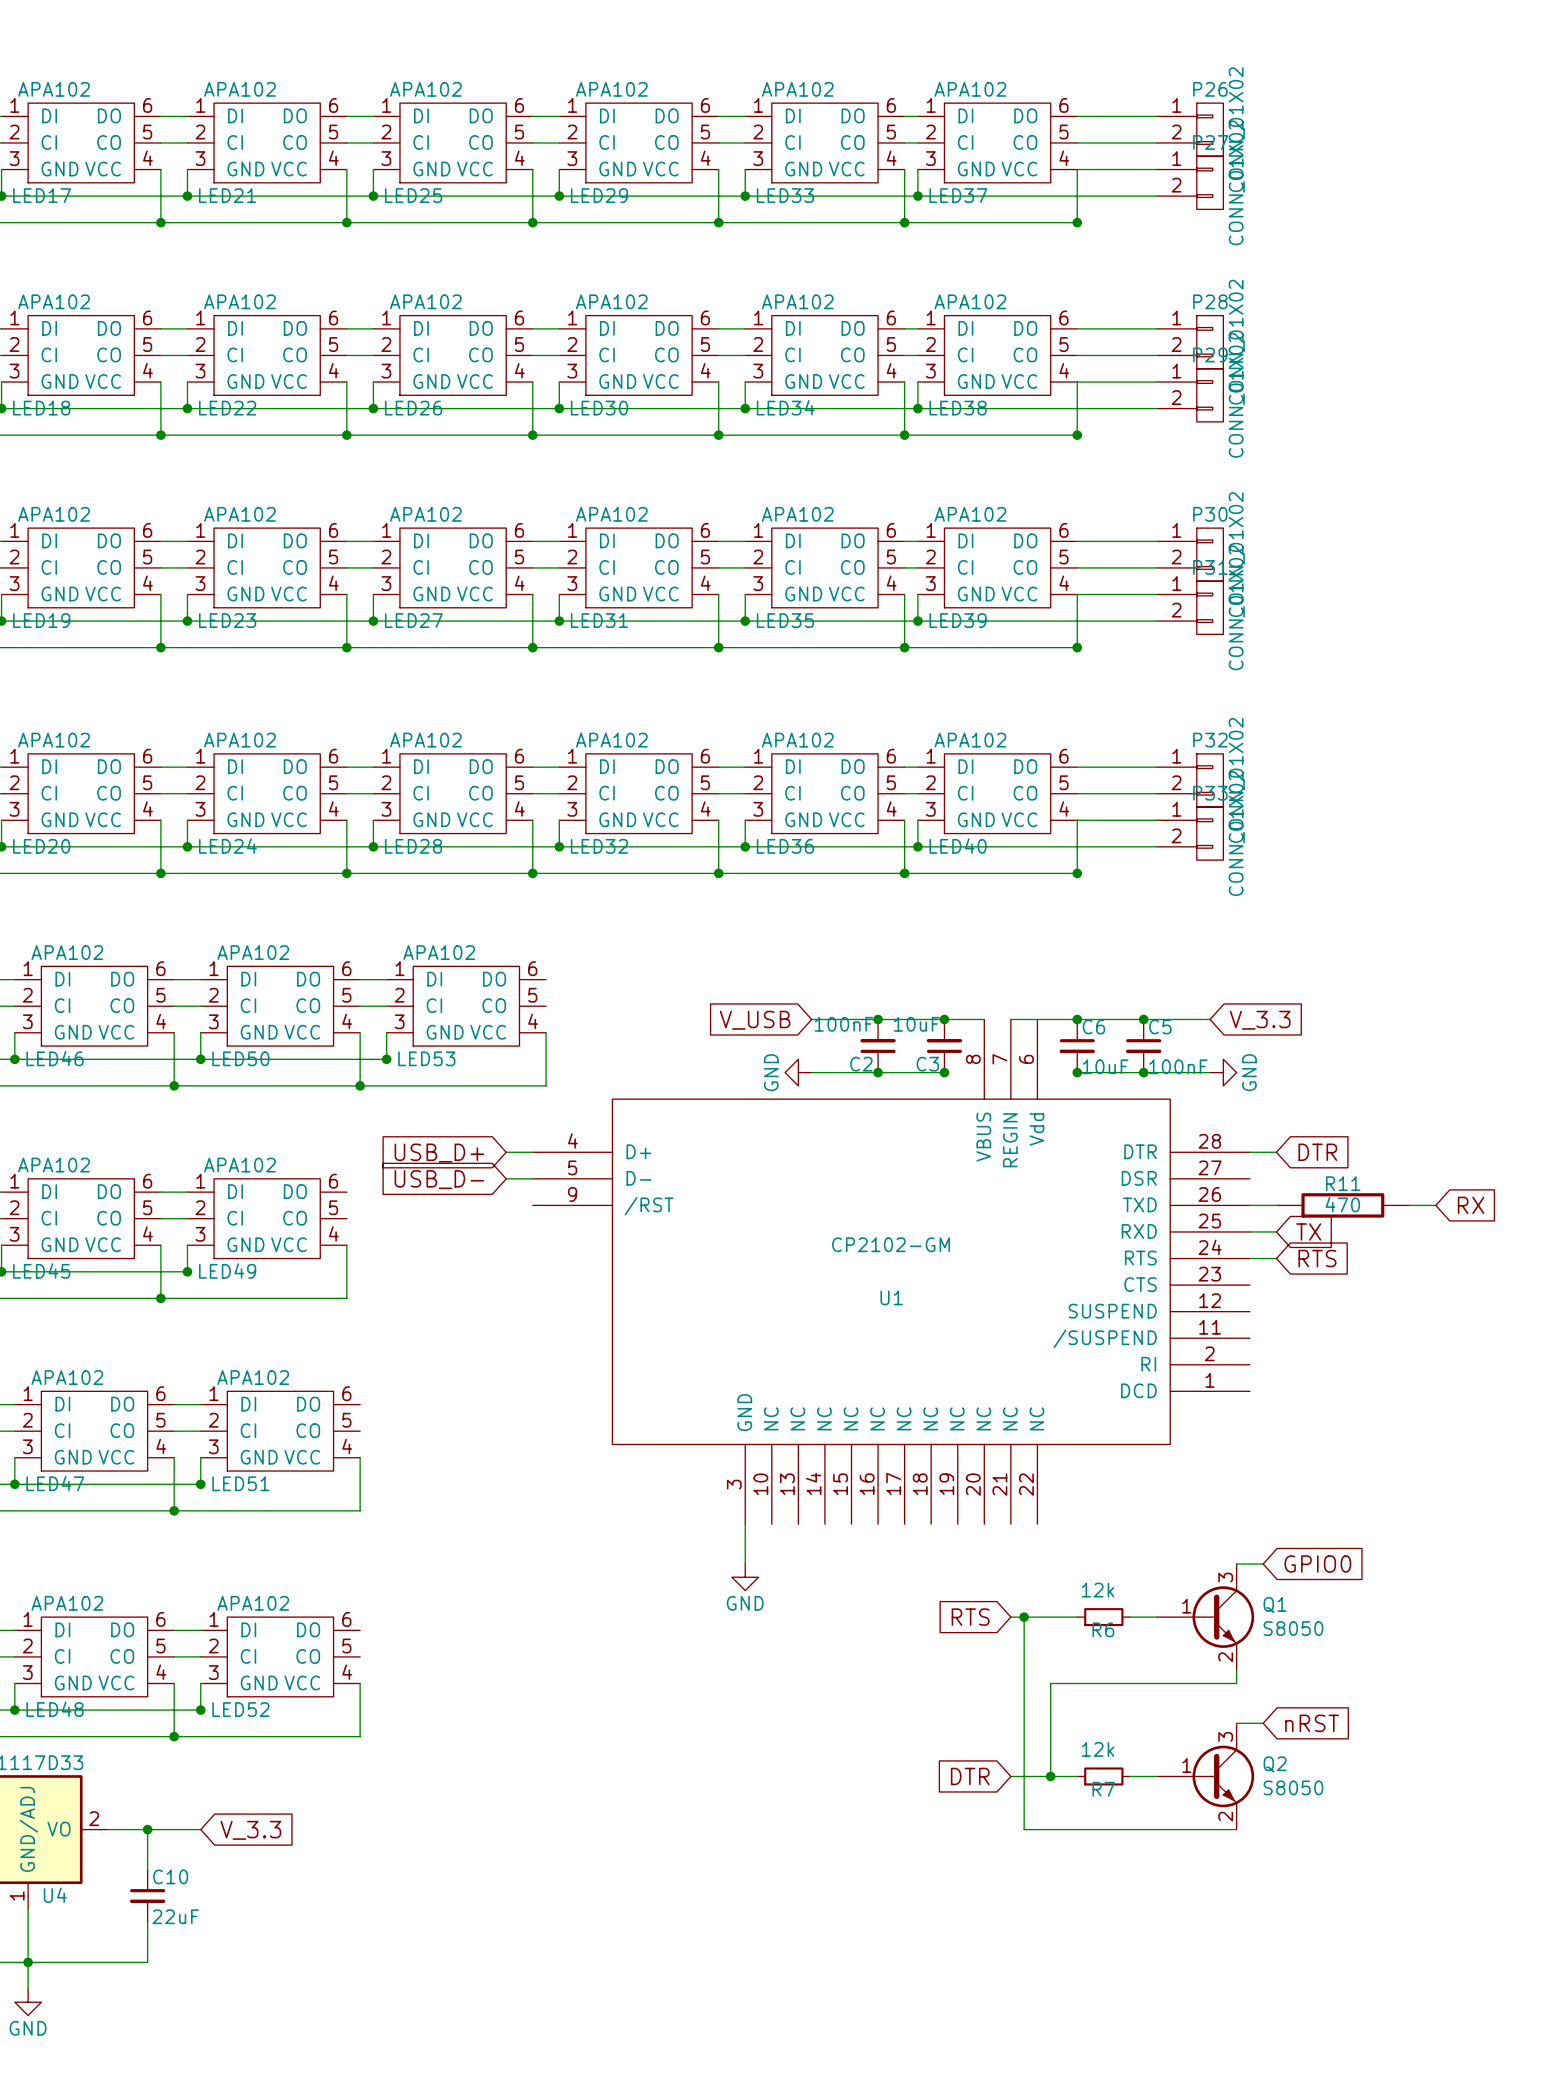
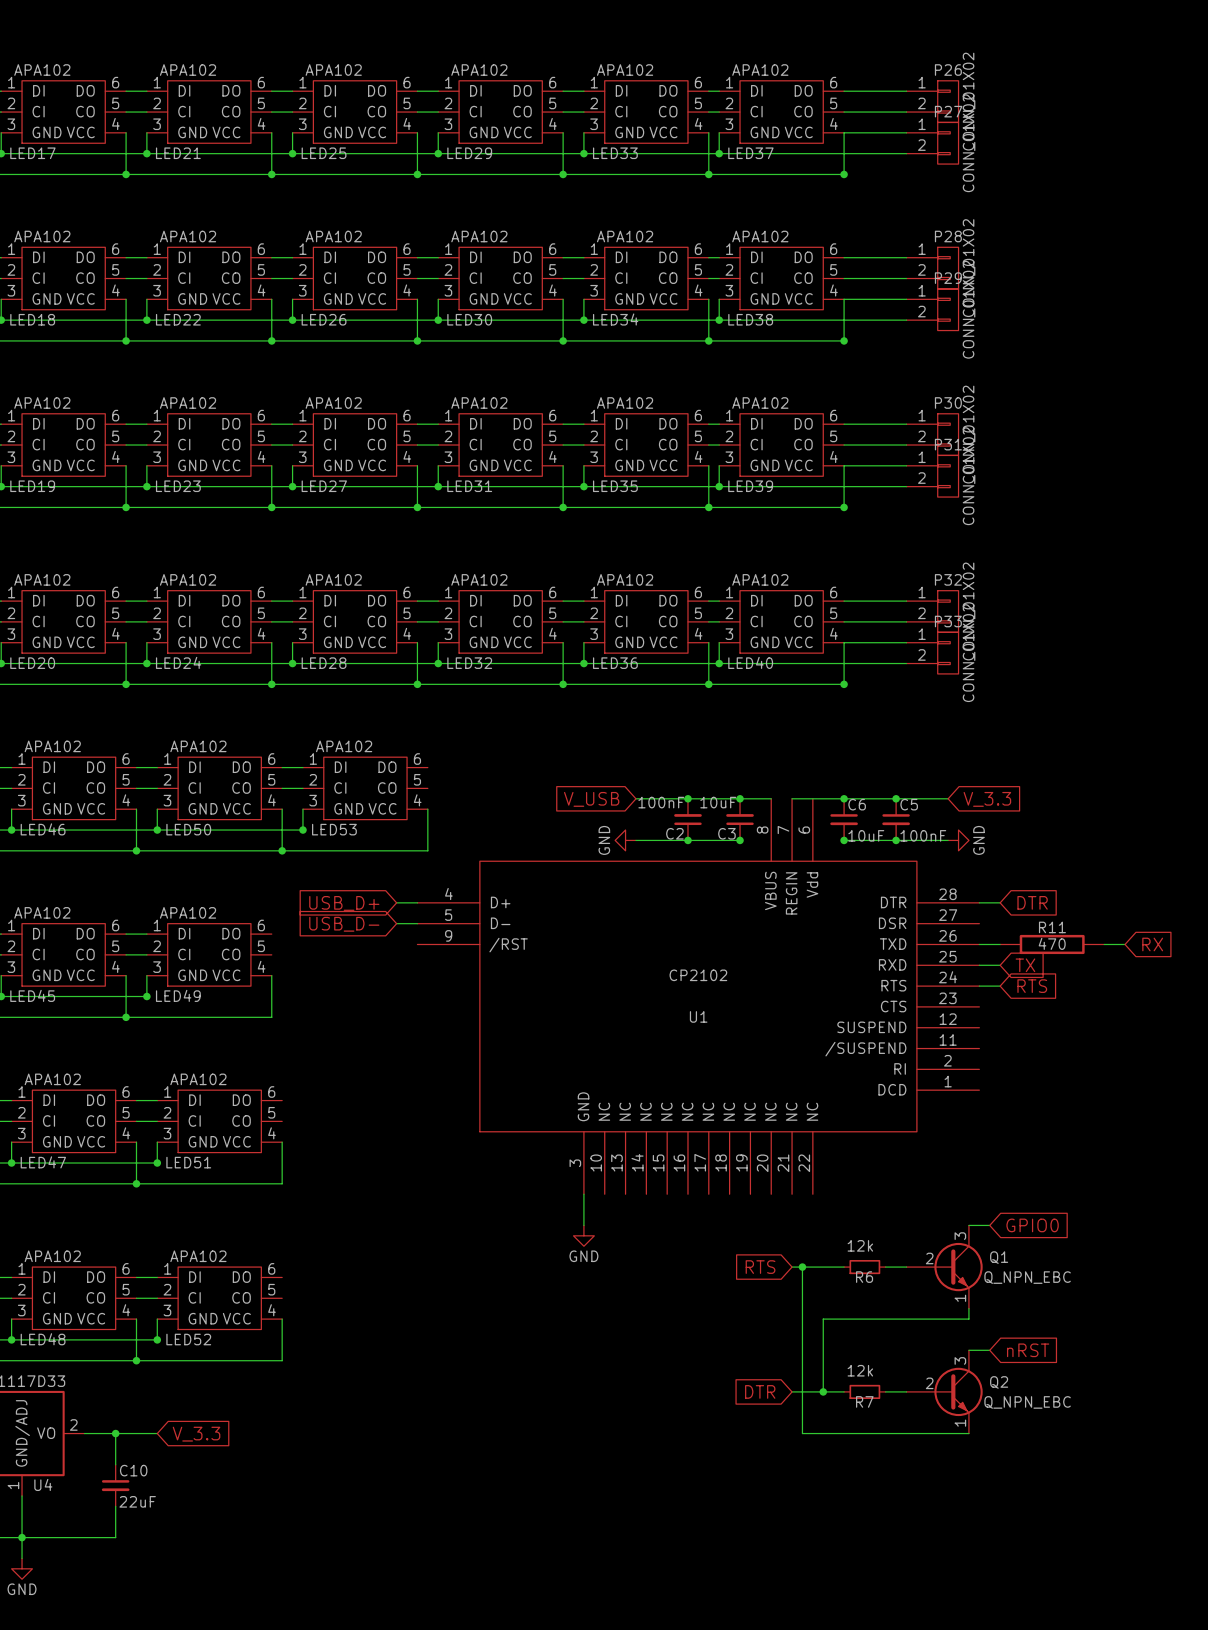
U1 value: CP2102-GM (891, 1244) -> CP2102 (698, 975)
Q1 pin number: 1 (1186, 1606) -> 2 (929, 1258)
Q1 value: S8050 (1293, 1628) -> Q_NPN_EBC (1027, 1277)
Q1 pin number: 2 (1225, 1657) -> 1 (960, 1298)
Q2 pin number: 1 (1186, 1765) -> 2 (929, 1383)
Q2 value: S8050 (1293, 1787) -> Q_NPN_EBC (1027, 1402)
Q2 pin number: 2 (1225, 1816) -> 1 (960, 1423)

